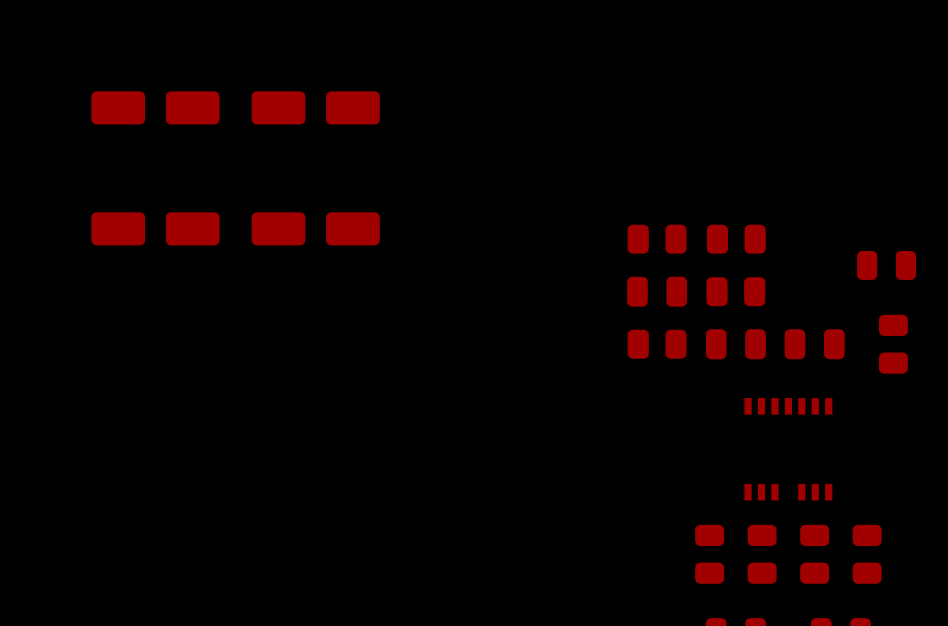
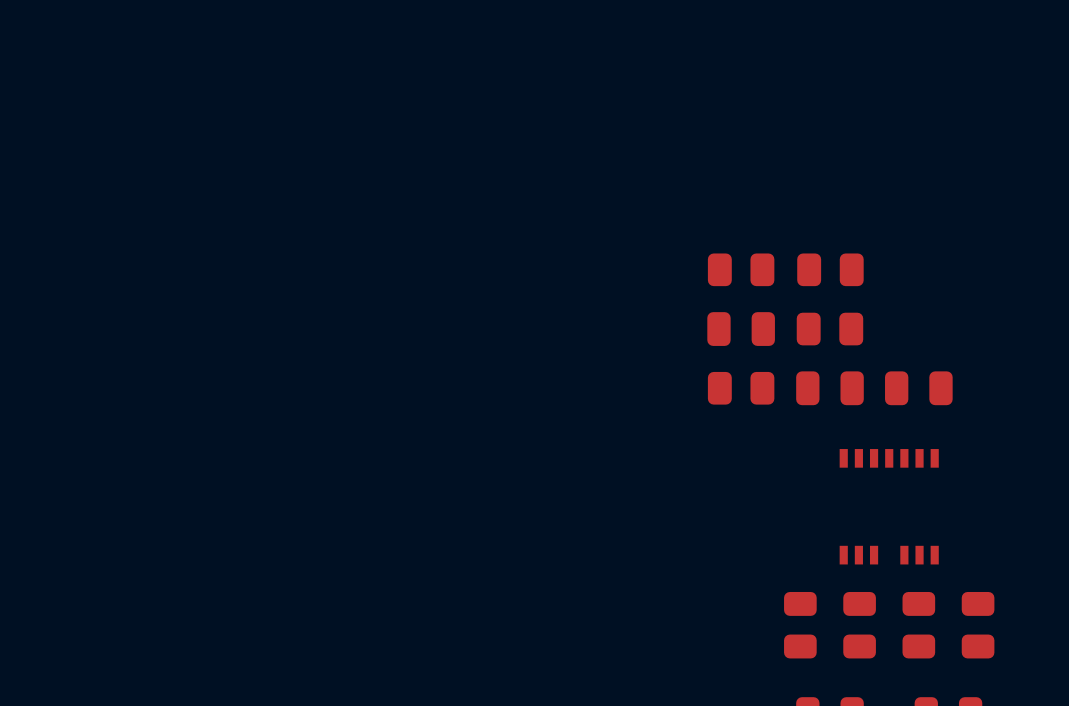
part: (155, 107) -> none
part: (315, 107) -> none
part: (155, 228) -> none
part: (315, 228) -> none
part: (886, 265) -> none
part: (893, 344) -> none

